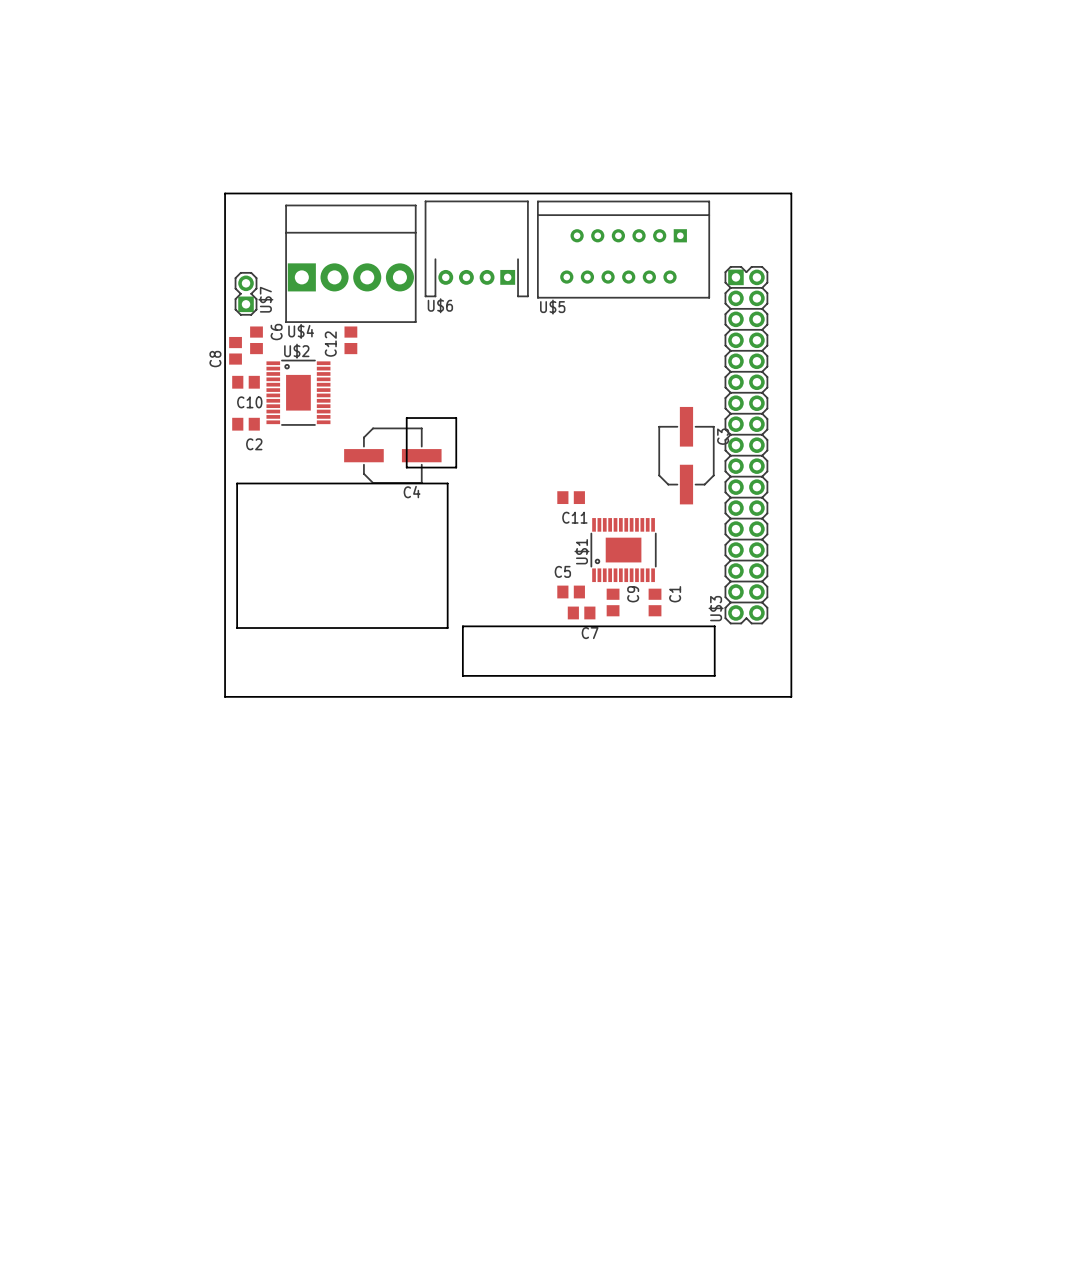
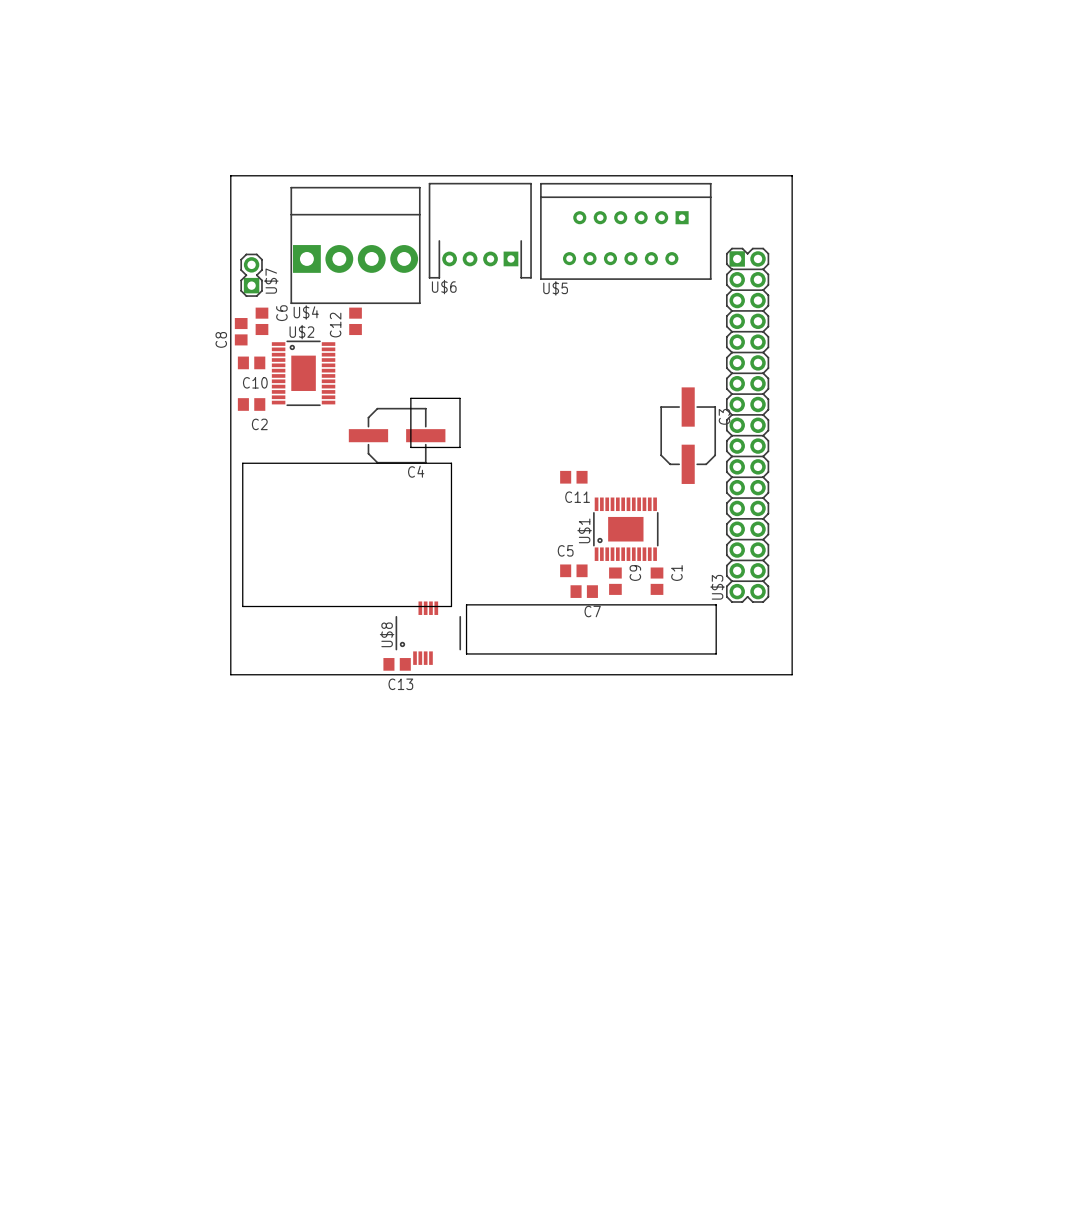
U$8: none -> (428, 633)
C13: none -> (397, 664)

